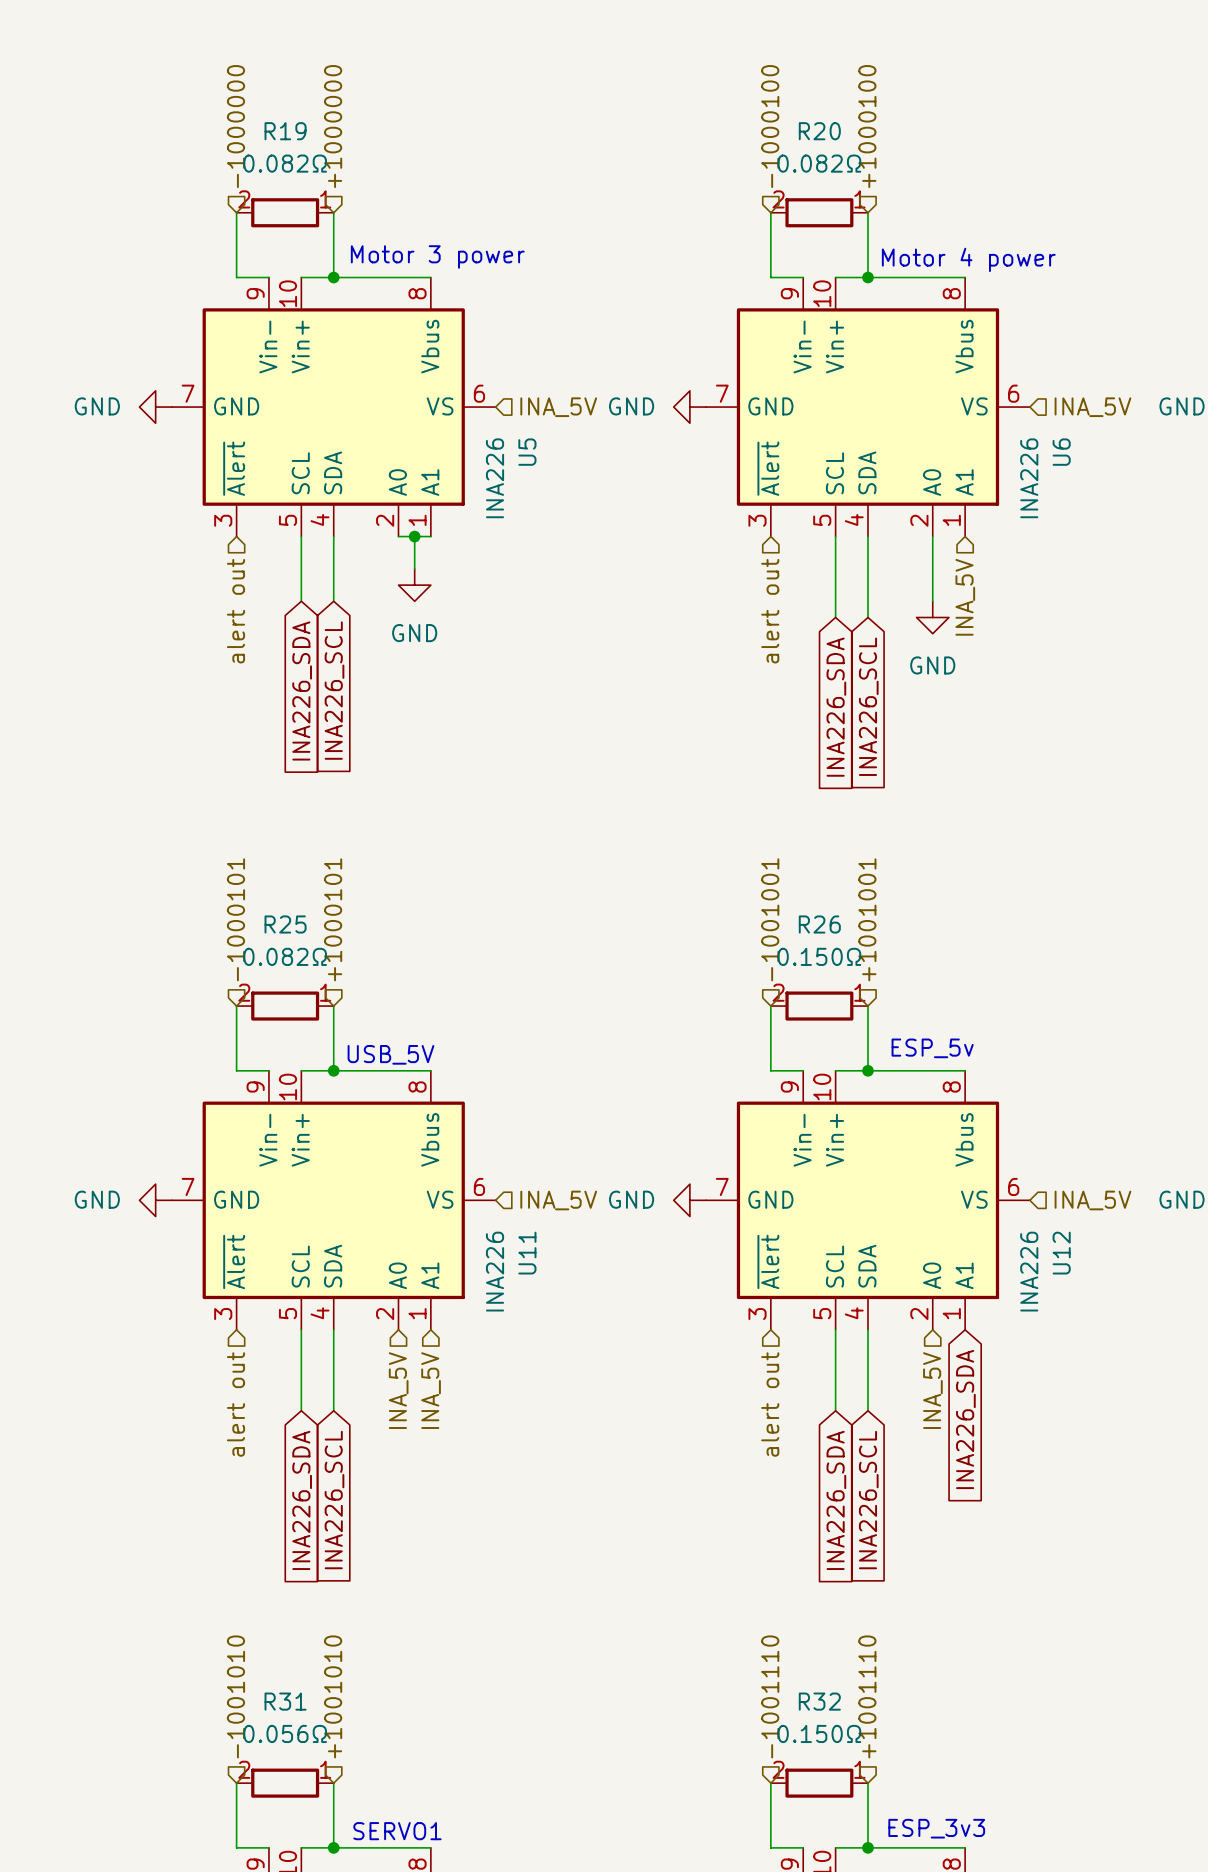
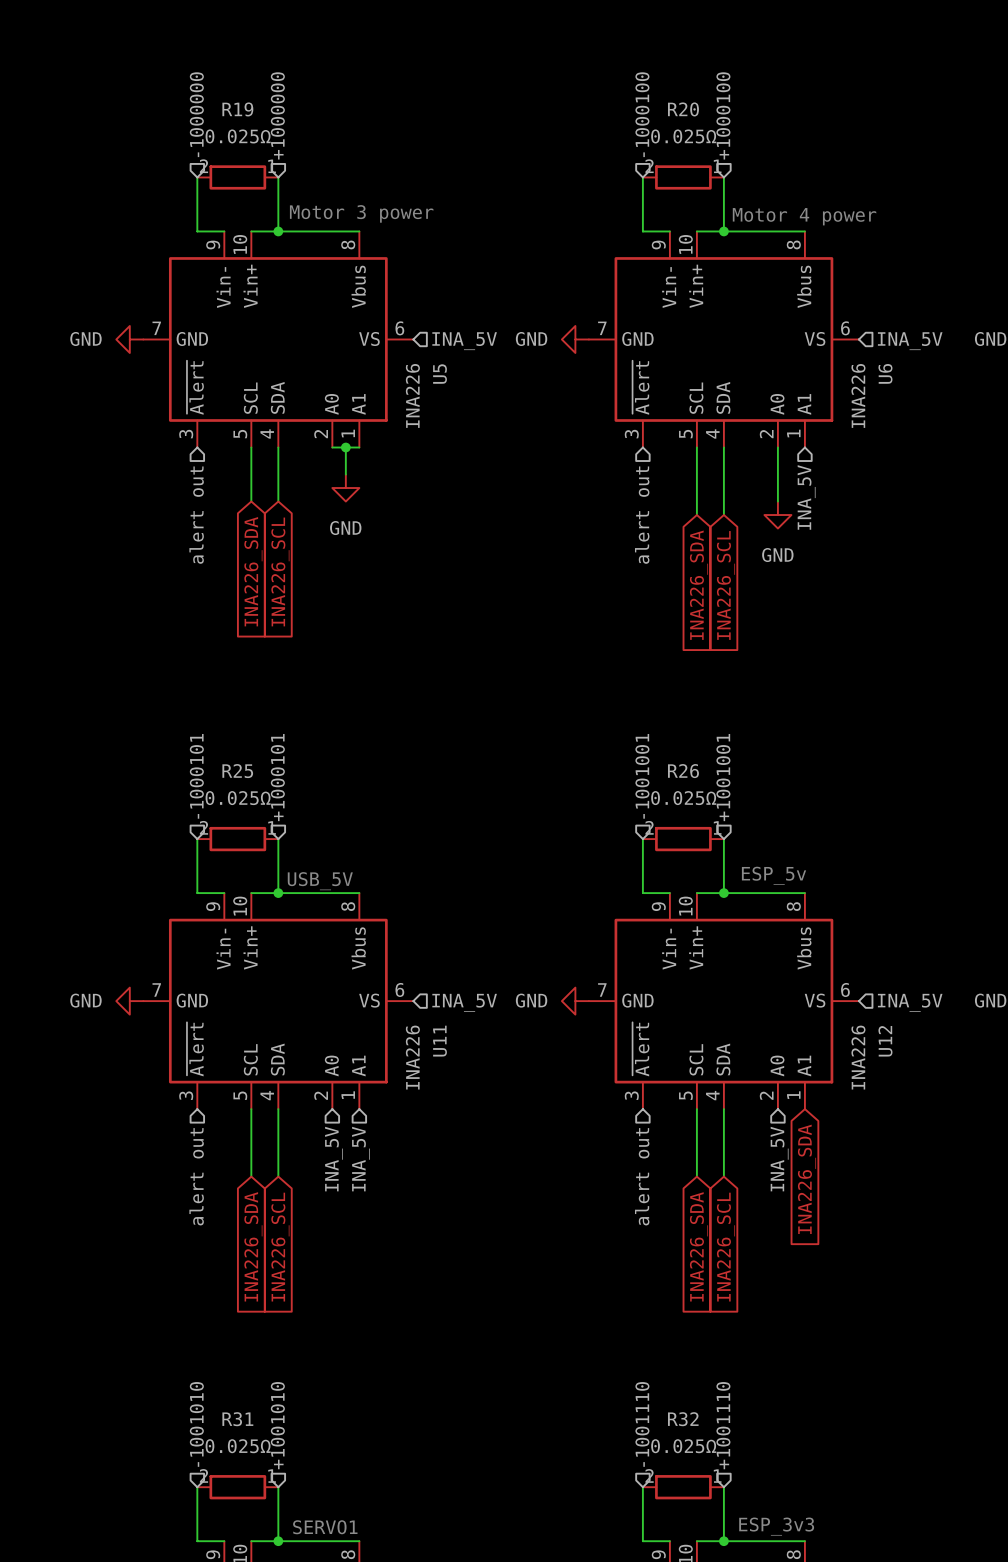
R19 value: 0.082Ω (285, 163) -> 0.025Ω (238, 136)
R20 value: 0.082Ω (819, 163) -> 0.025Ω (683, 136)
R25 value: 0.082Ω (285, 956) -> 0.025Ω (238, 798)
R26 value: 0.150Ω (819, 956) -> 0.025Ω (683, 798)
R31 value: 0.056Ω (285, 1733) -> 0.025Ω (238, 1446)
R32 value: 0.150Ω (819, 1733) -> 0.025Ω (683, 1446)

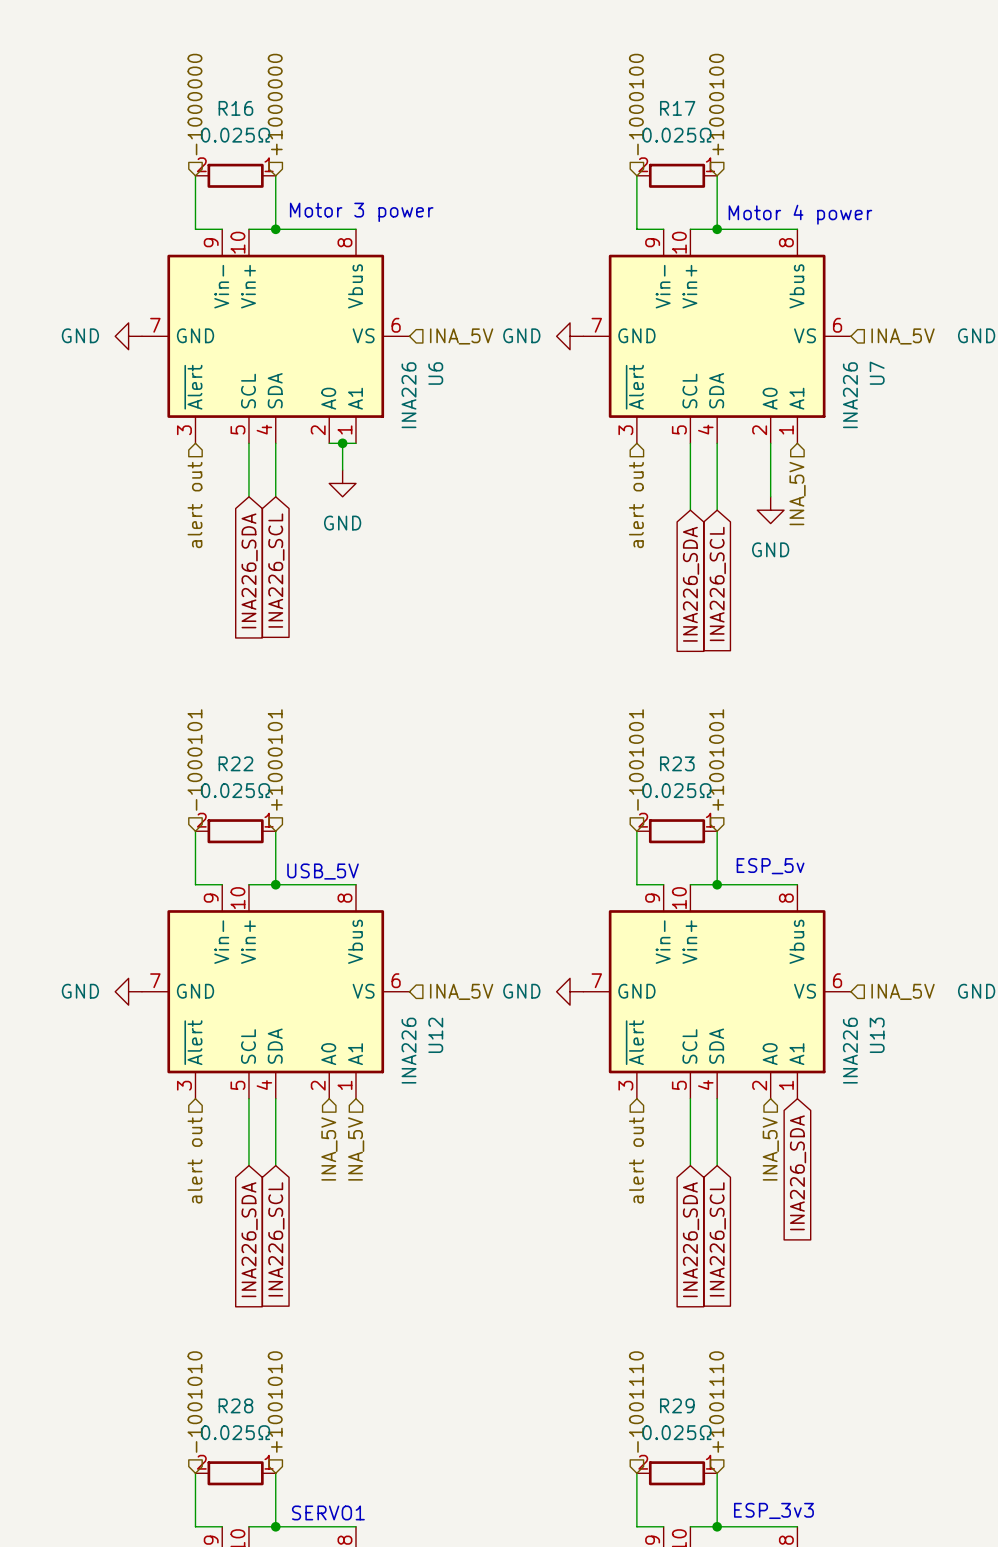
R19 name: R19 (237, 109) -> R16 (235, 108)
R20 name: R20 (683, 109) -> R17 (677, 108)
U6 name: U6 (885, 373) -> U7 (877, 373)
U5 name: U5 (440, 374) -> U6 (435, 373)
R25 name: R25 (237, 771) -> R22 (235, 763)
R26 name: R26 (683, 771) -> R23 (677, 763)
U11 name: U11 (440, 1041) -> U12 (435, 1035)
U12 name: U12 (885, 1041) -> U13 (877, 1035)
R31 name: R31 (237, 1419) -> R28 (235, 1405)
R32 name: R32 (683, 1419) -> R29 (677, 1405)

